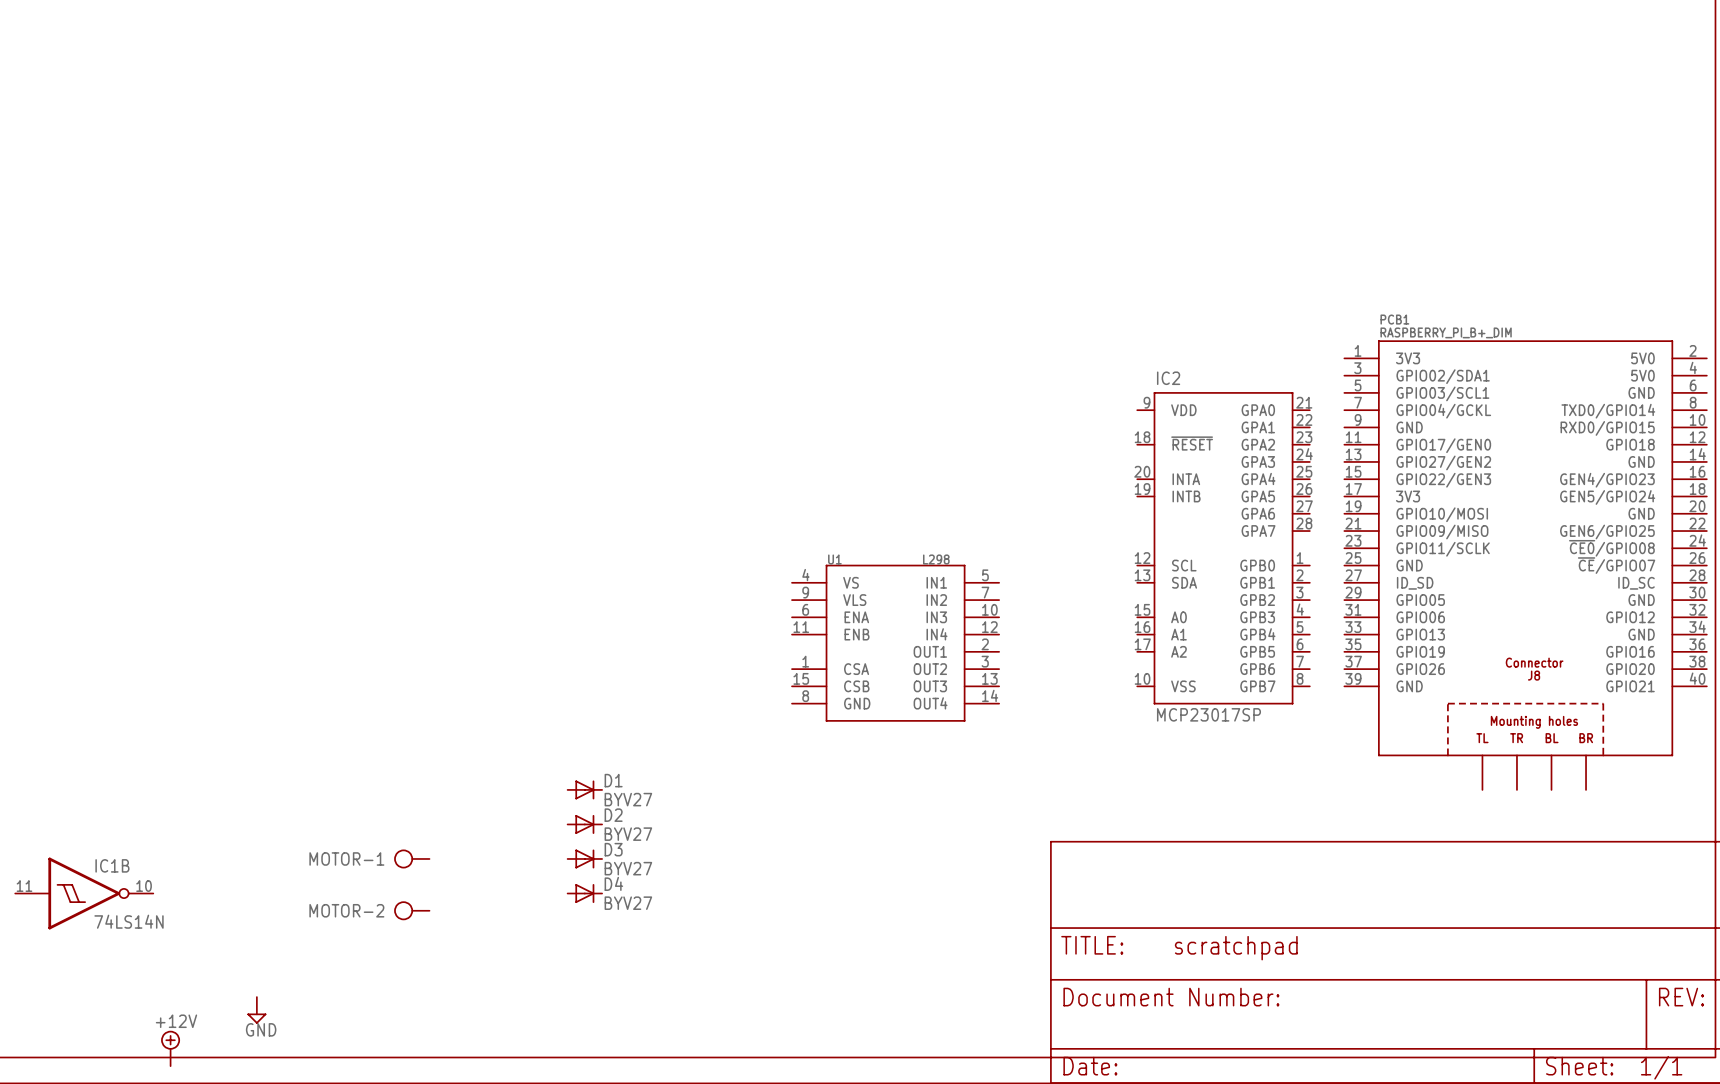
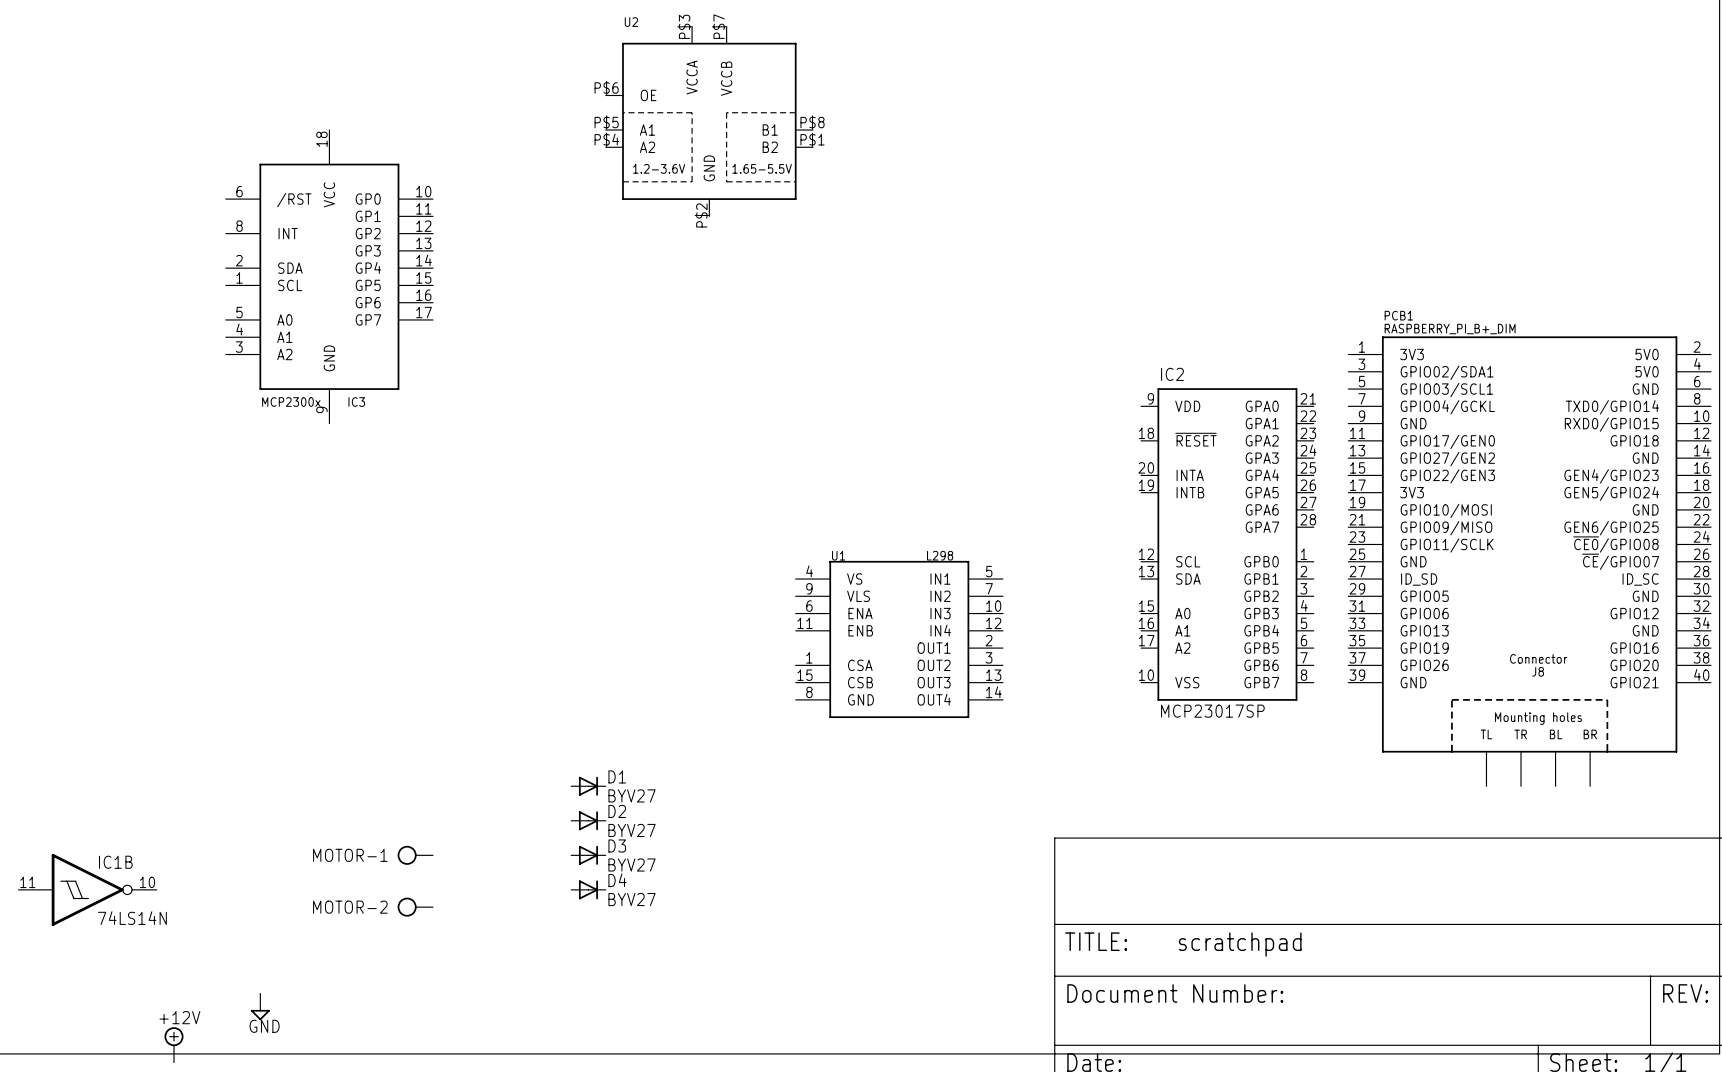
U2: none -> (709, 121)
IC3: none -> (329, 276)

